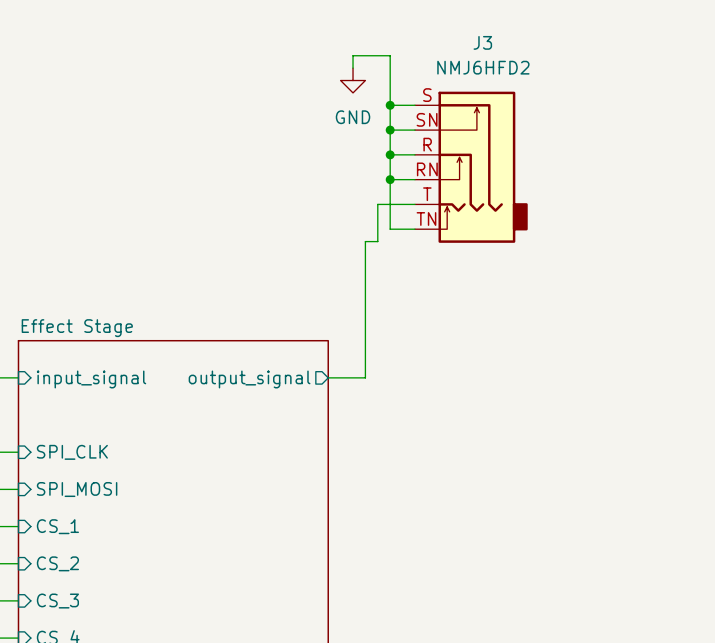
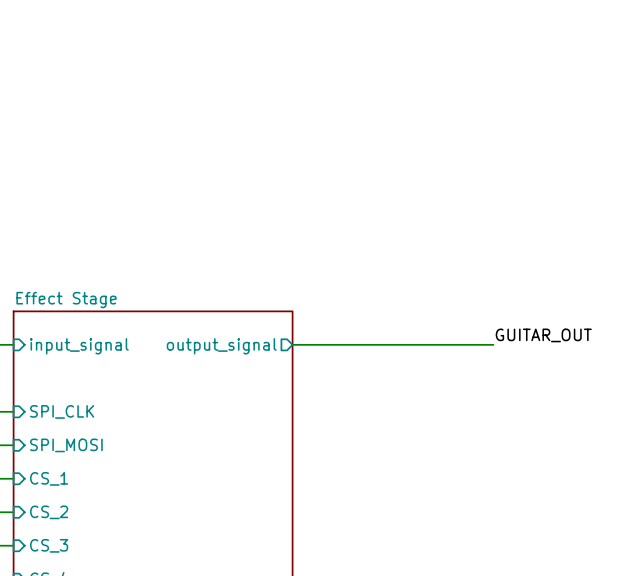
wire: (353, 68) (353, 55) (390, 55) (390, 229) (414, 229) -> none
power symbol: GND (353, 80) -> none
wire: (390, 105) (414, 105) -> none
junction: (390, 105) -> none
wire: (390, 130) (414, 130) -> none
junction: (390, 130) -> none
wire: (390, 154) (414, 154) -> none
junction: (390, 154) -> none
J3: NMJ6HFD2 (471, 167) -> none
wire: (390, 179) (414, 179) -> none
junction: (390, 179) -> none
wire: (414, 204) (377, 204) (377, 241) (365, 241) (365, 377) -> (493, 344) (326, 344)
label: none -> GUITAR_OUT (543, 335)

